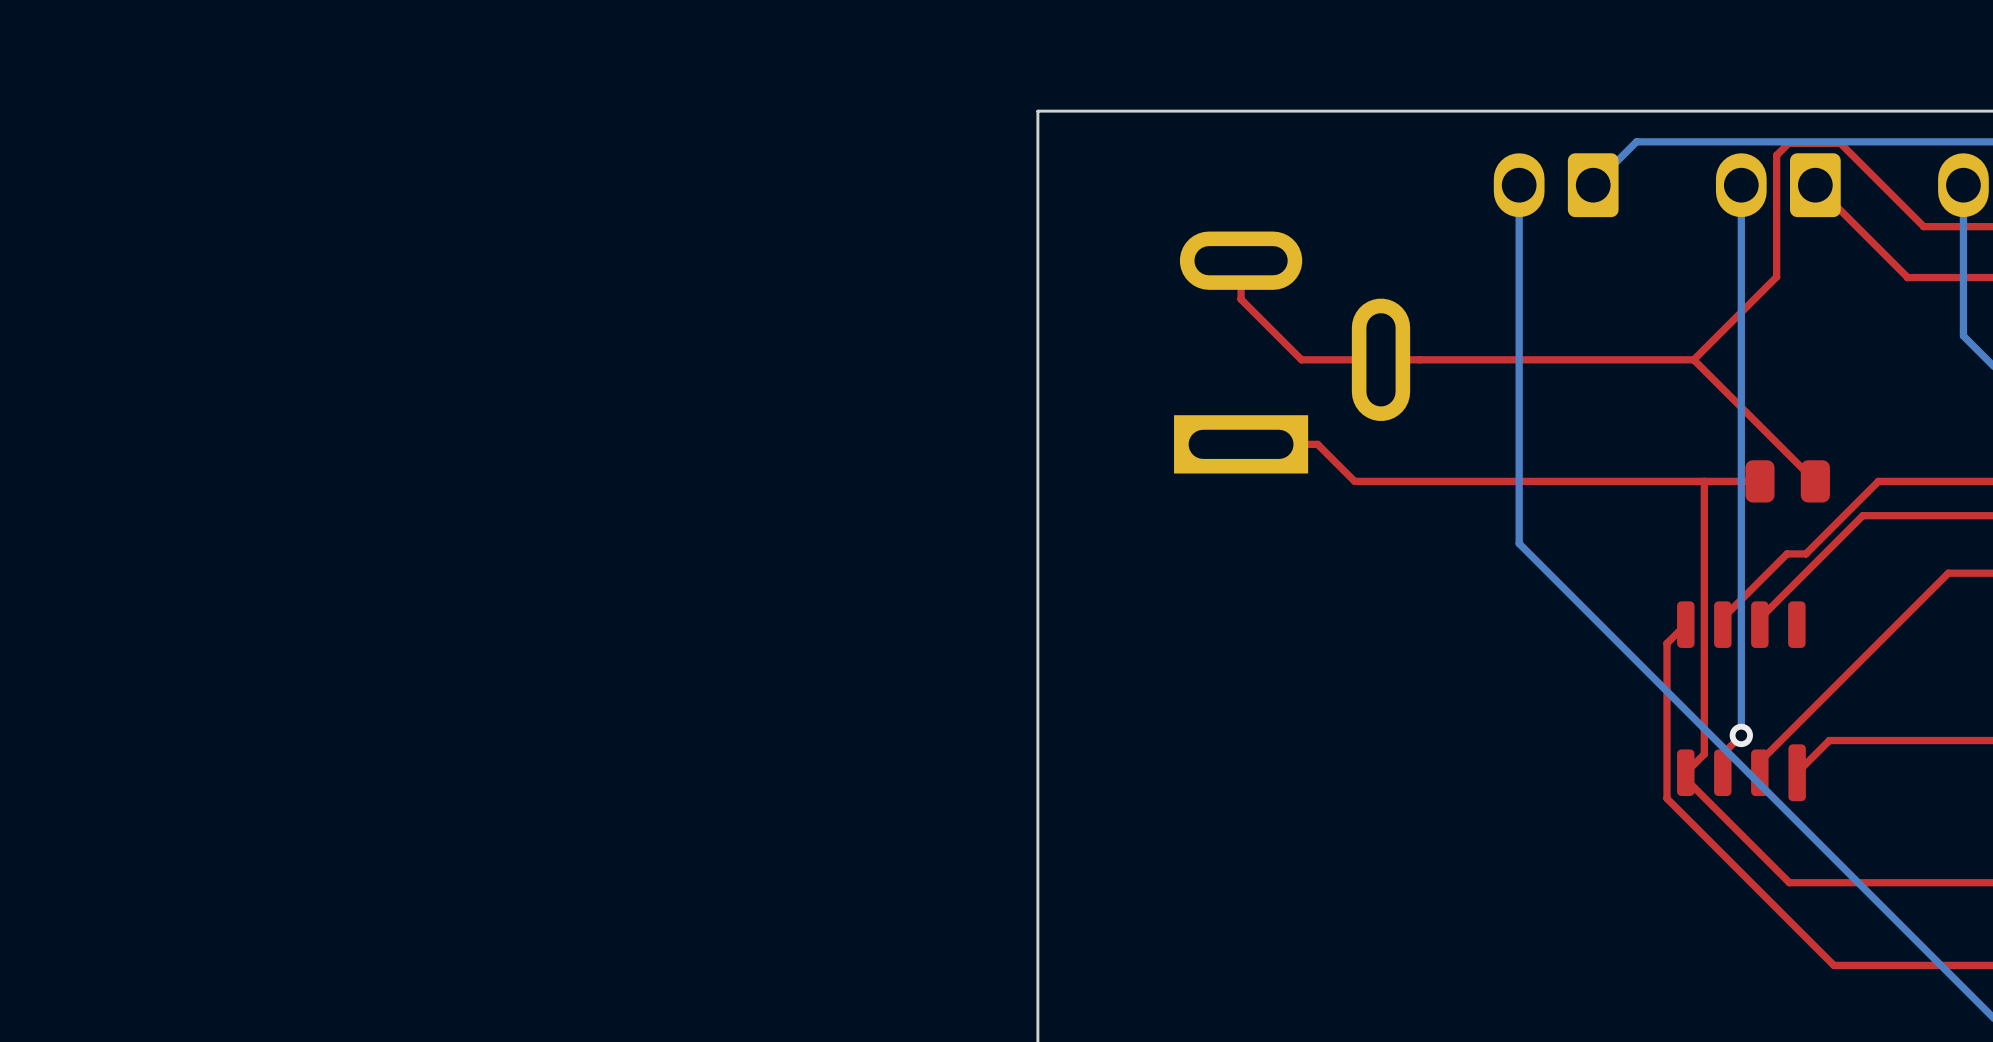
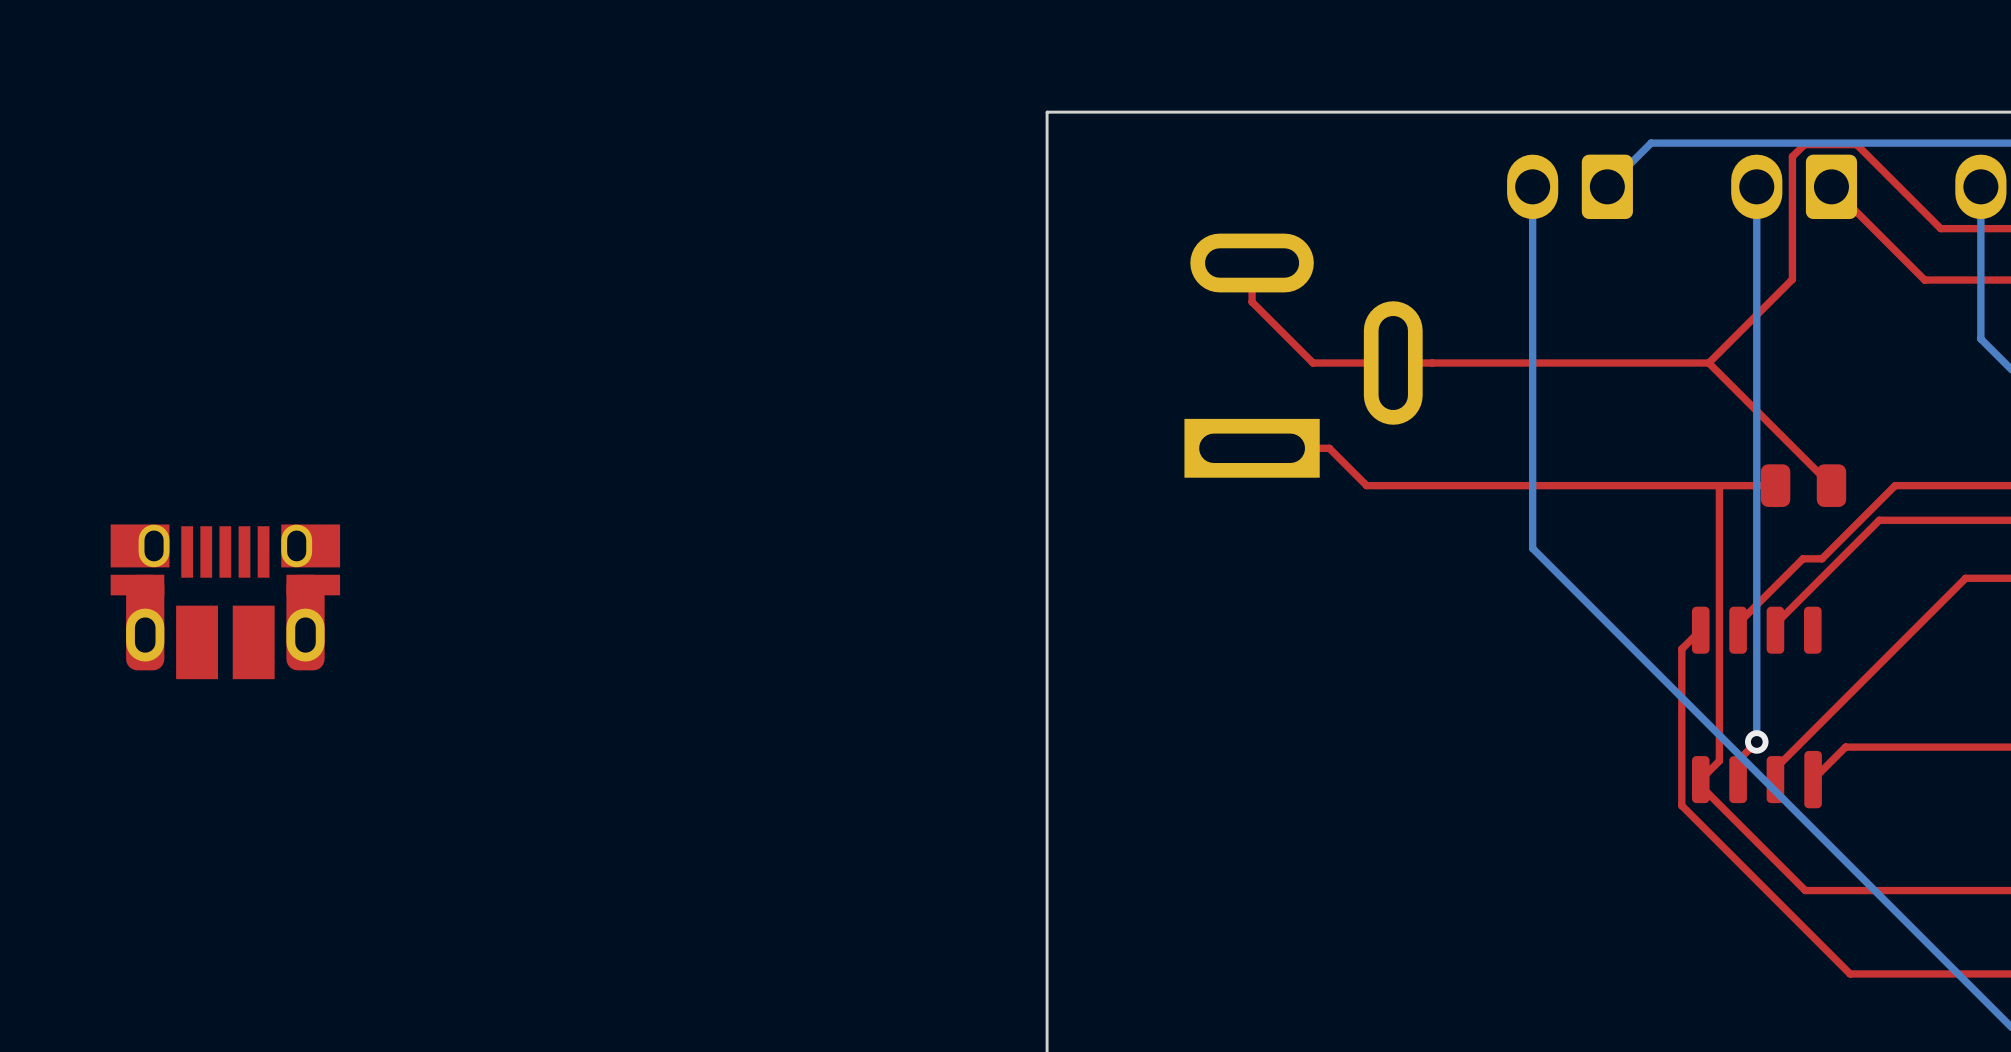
part: none -> (225, 601)

